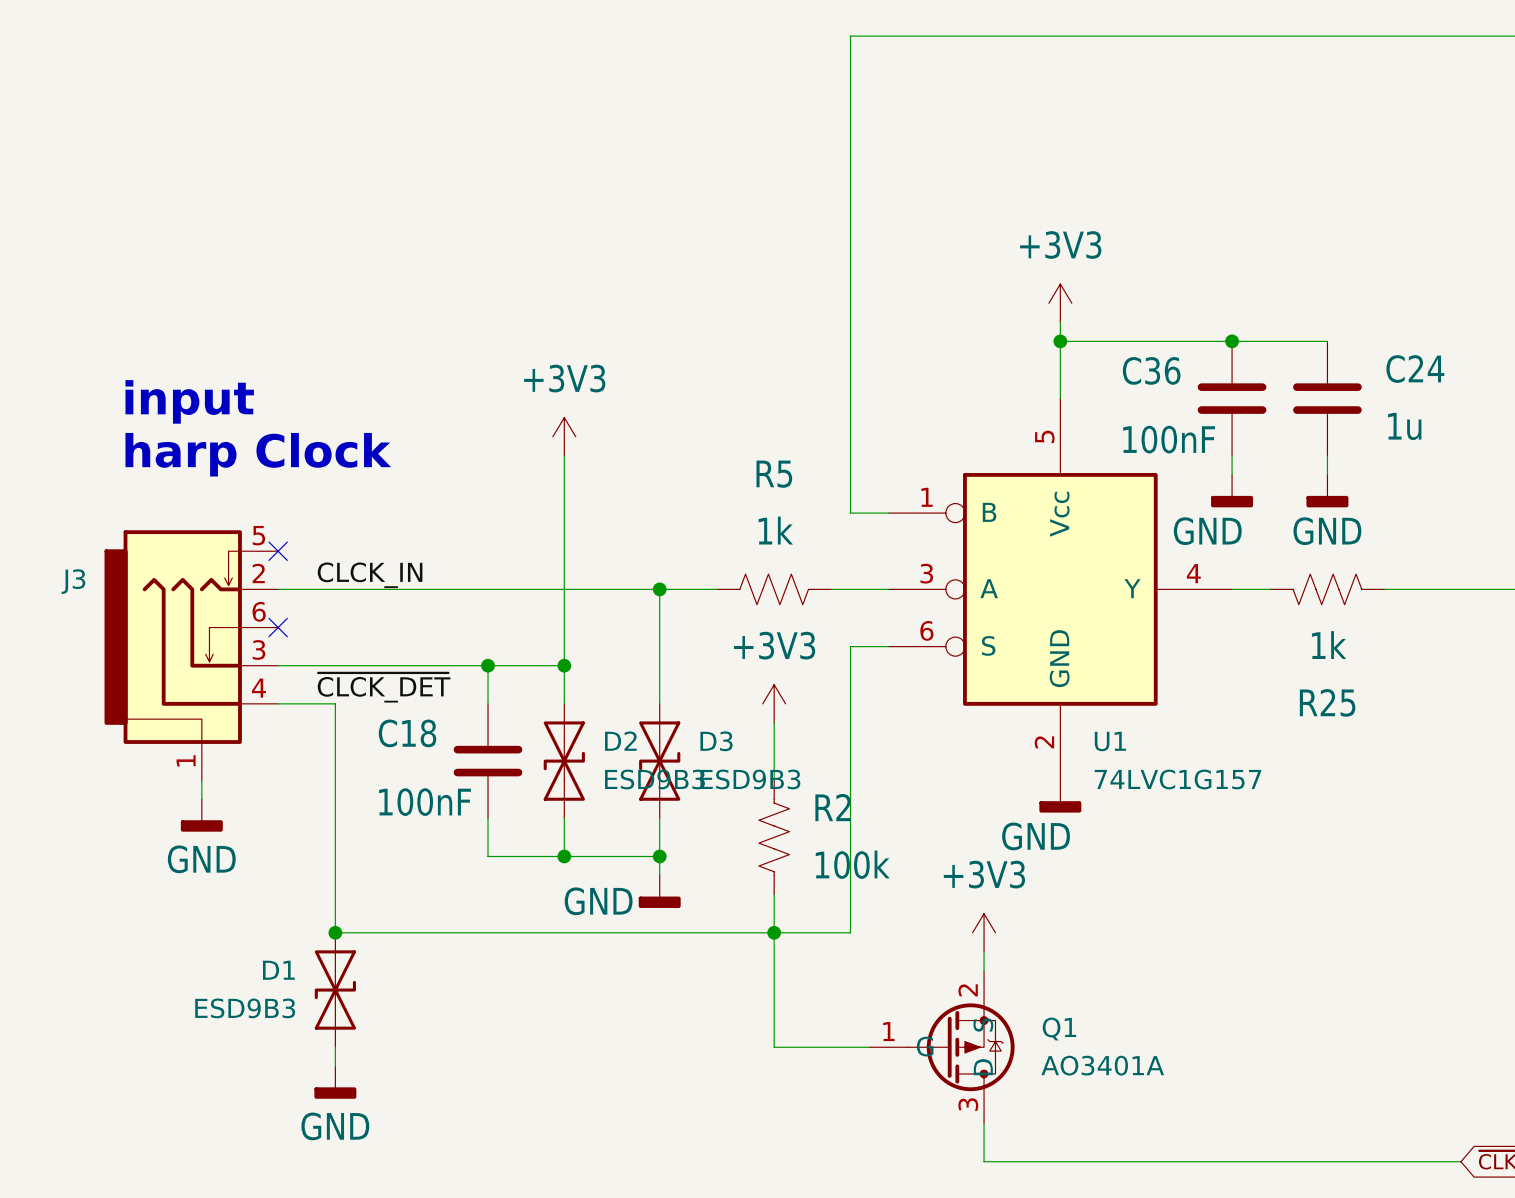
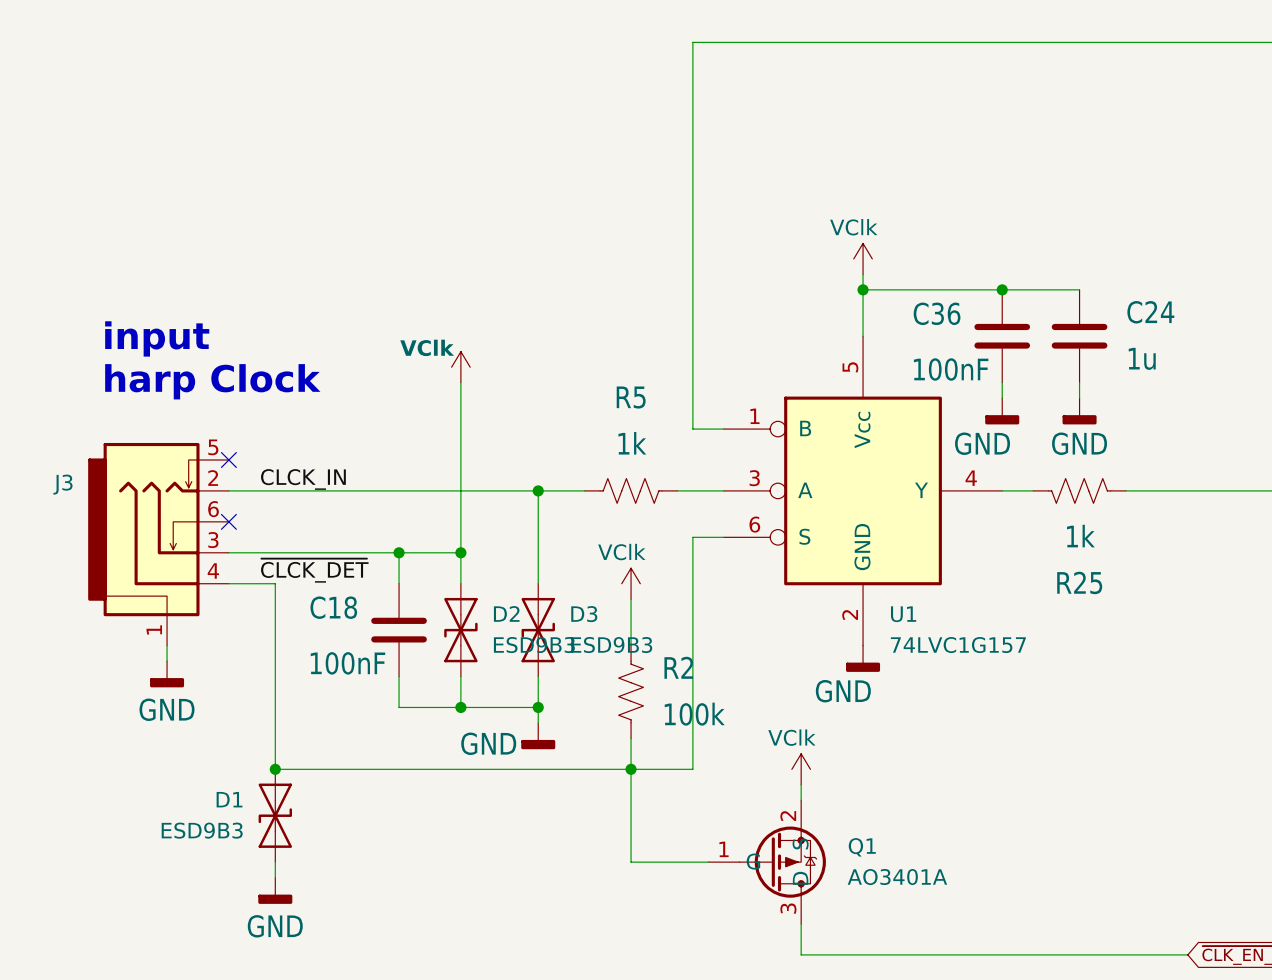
power symbol: +3V3 (1060, 303) -> VClk (863, 258)
power symbol: +3V3 (564, 436) -> VClk (460, 367)
power symbol: +3V3 (774, 703) -> VClk (631, 583)
power symbol: +3V3 (984, 932) -> VClk (801, 769)

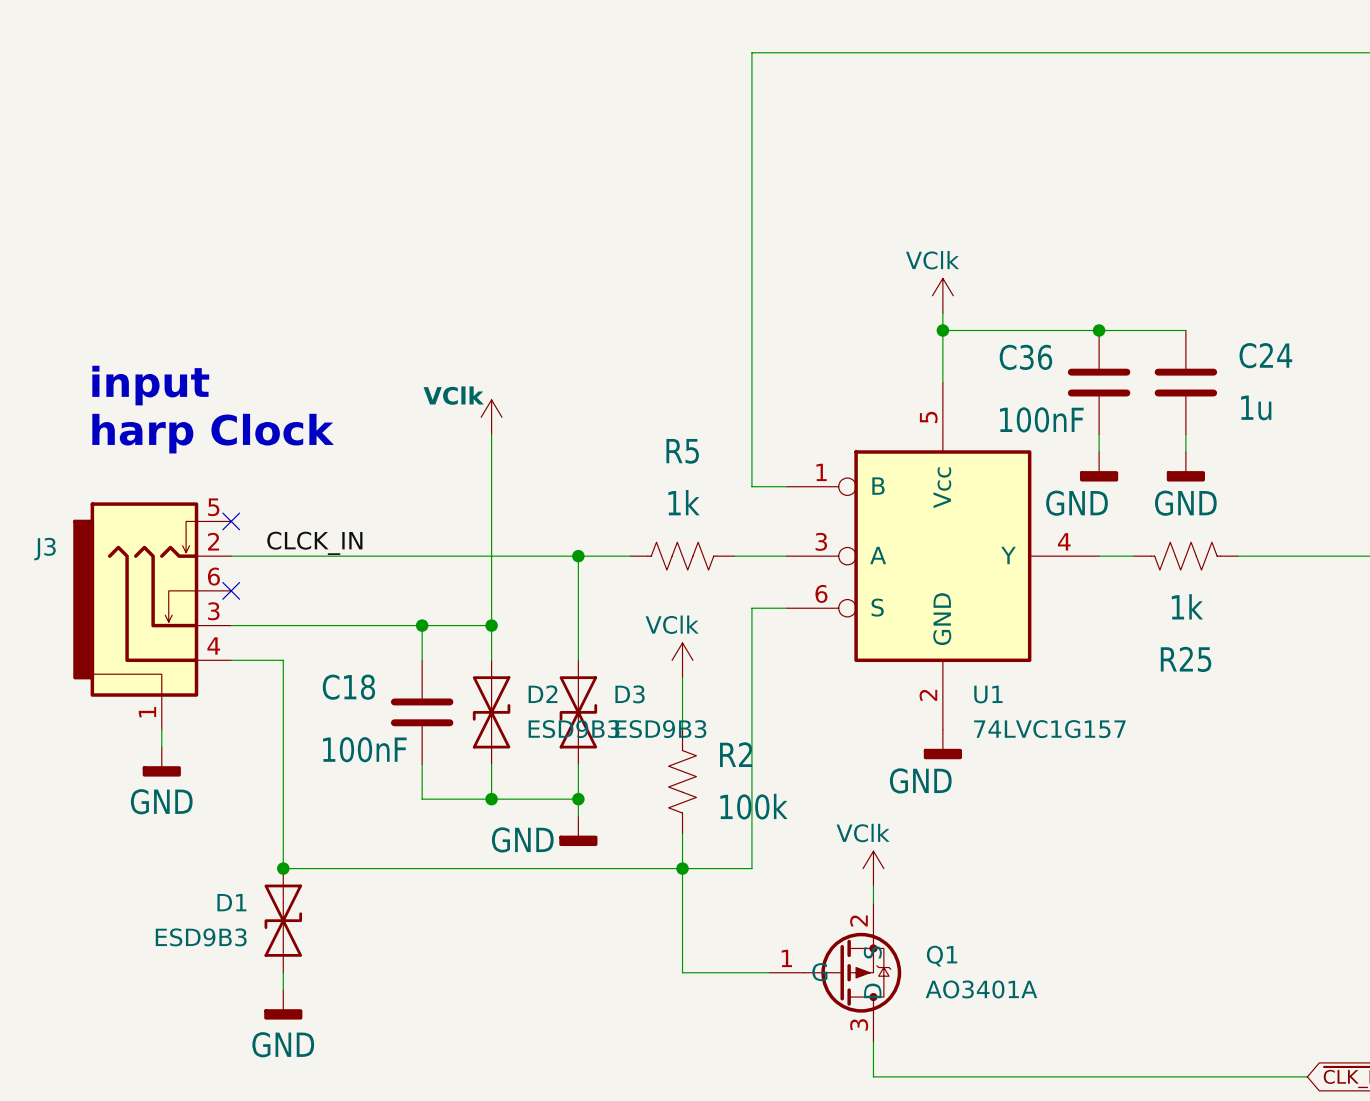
label: ~{CLCK_DET} (314, 570) -> none

